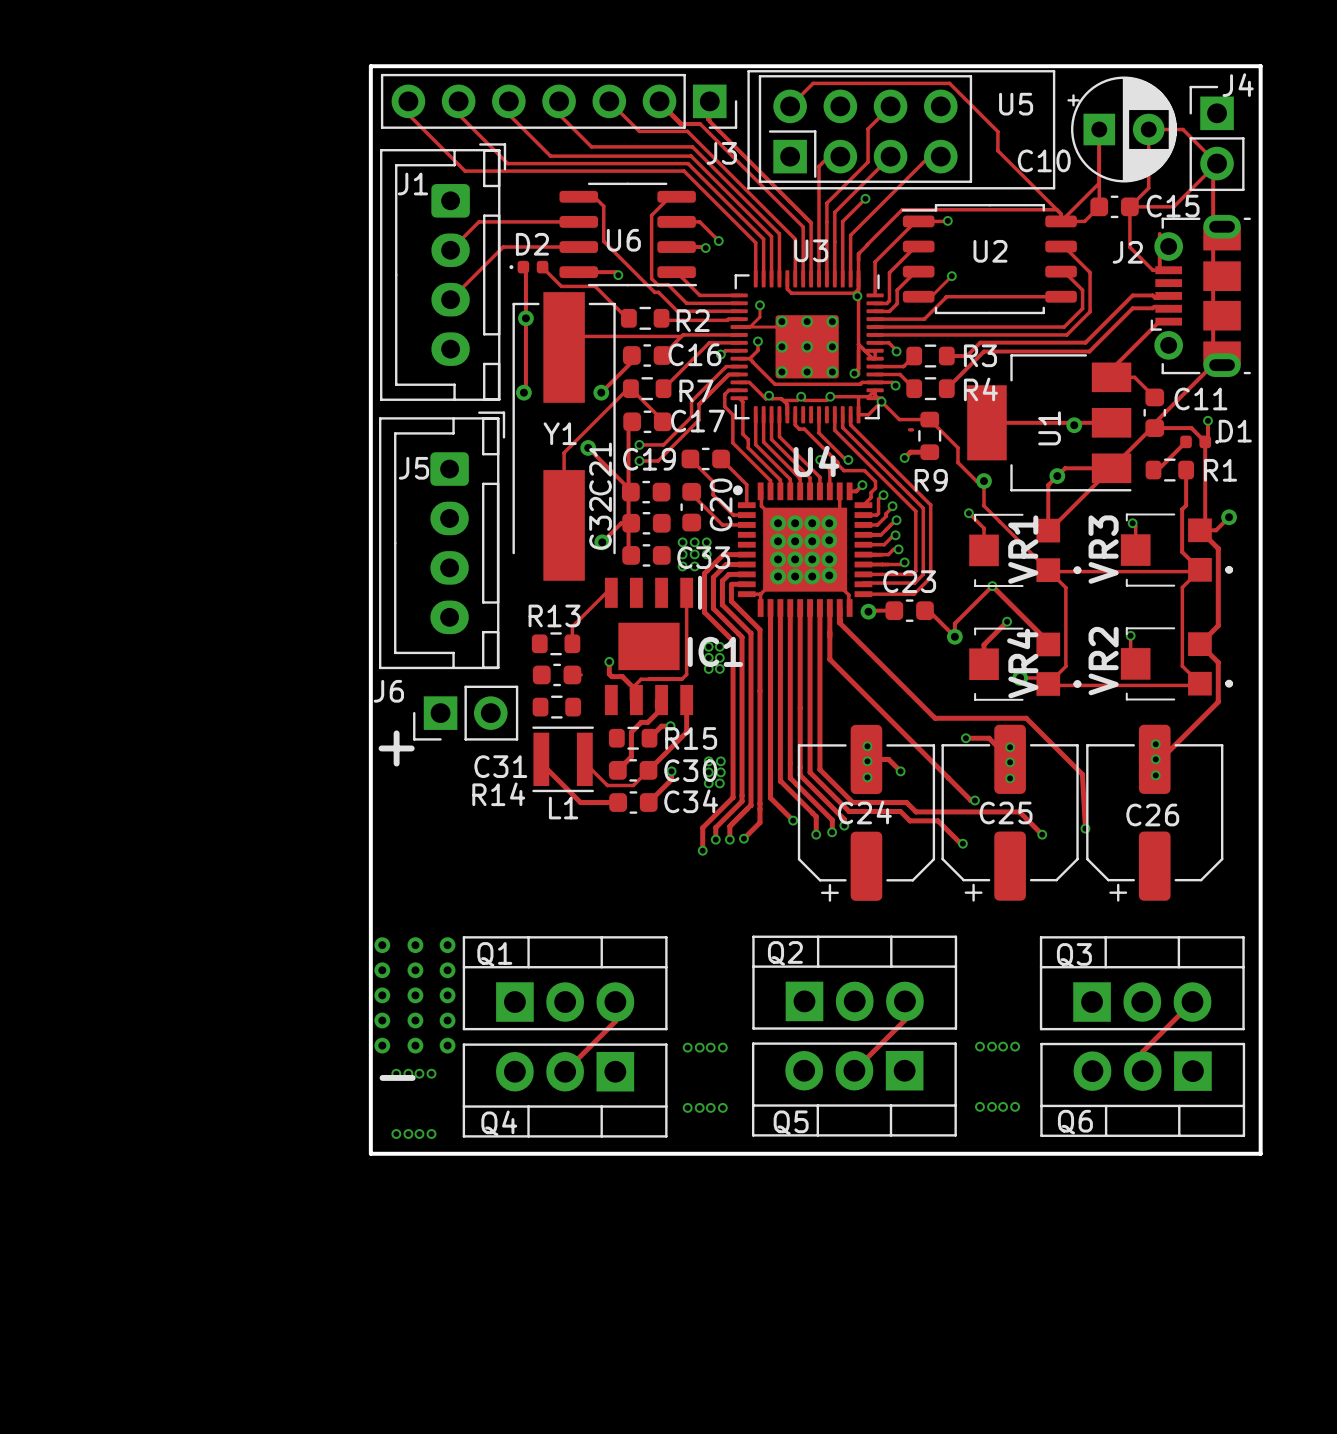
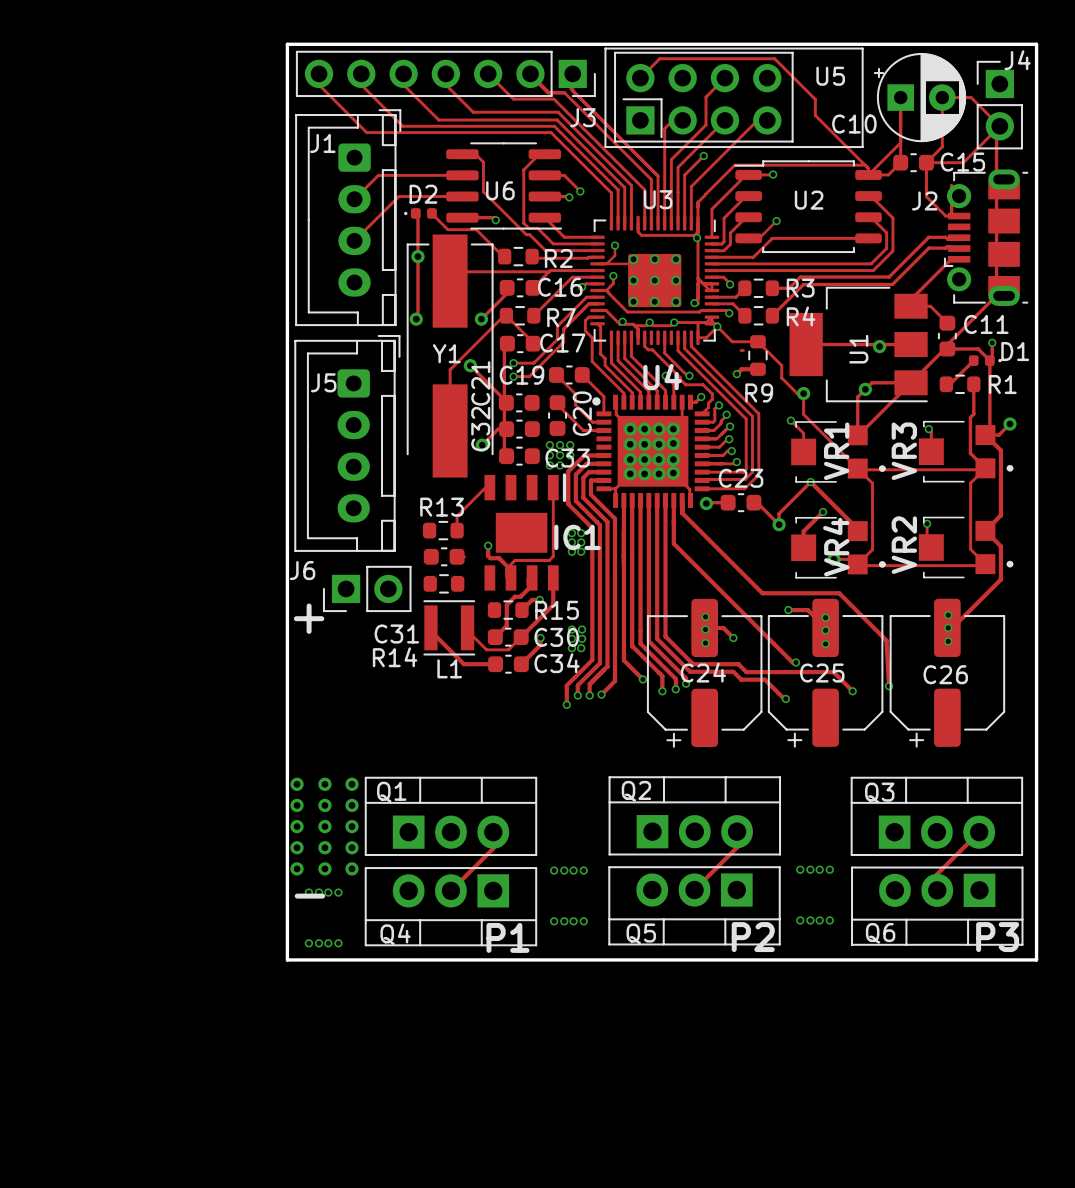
text: none -> P2 (753, 937)
text: none -> P3 (997, 937)
text: none -> P1 (507, 937)

